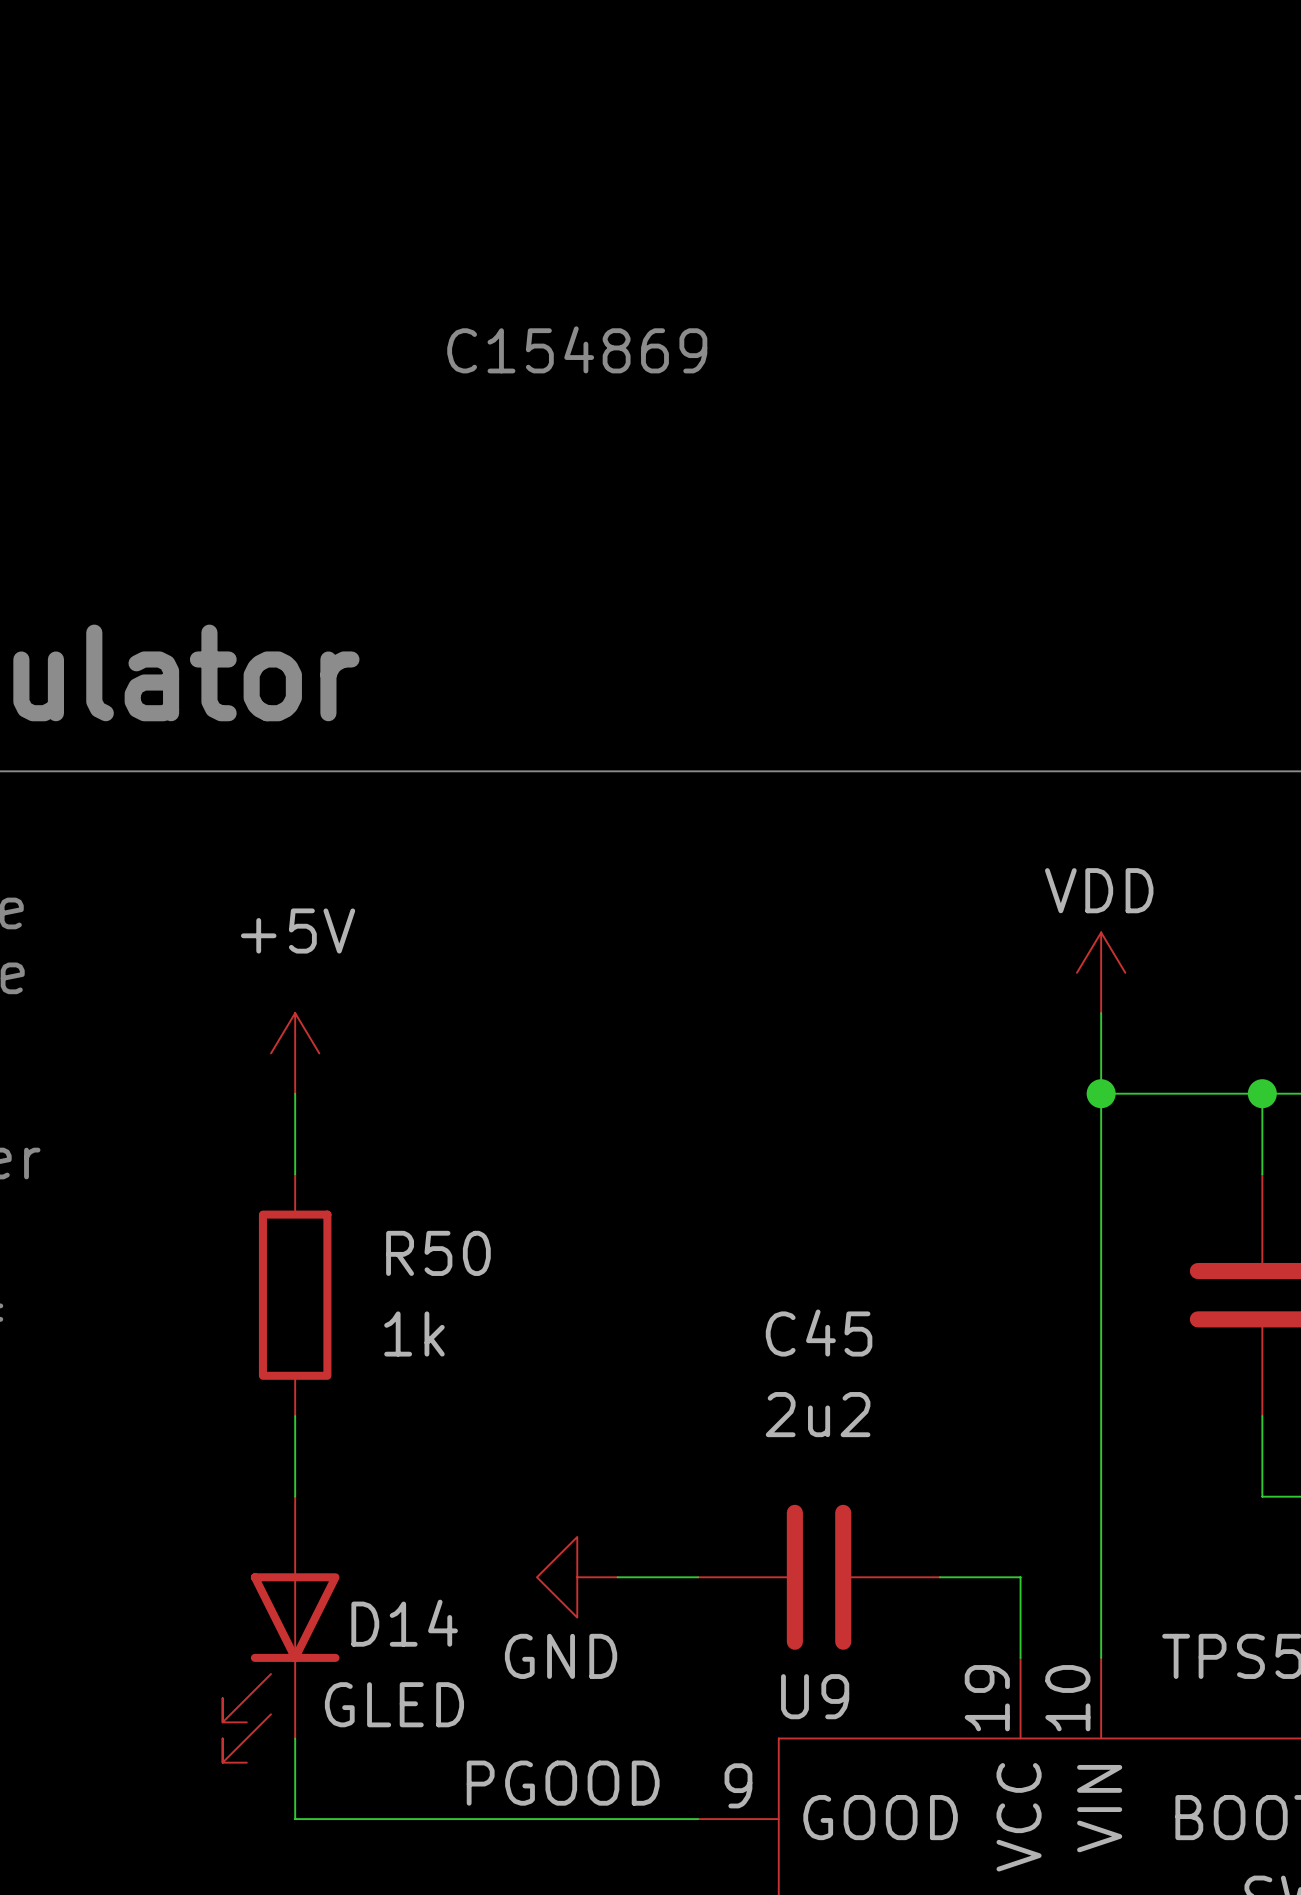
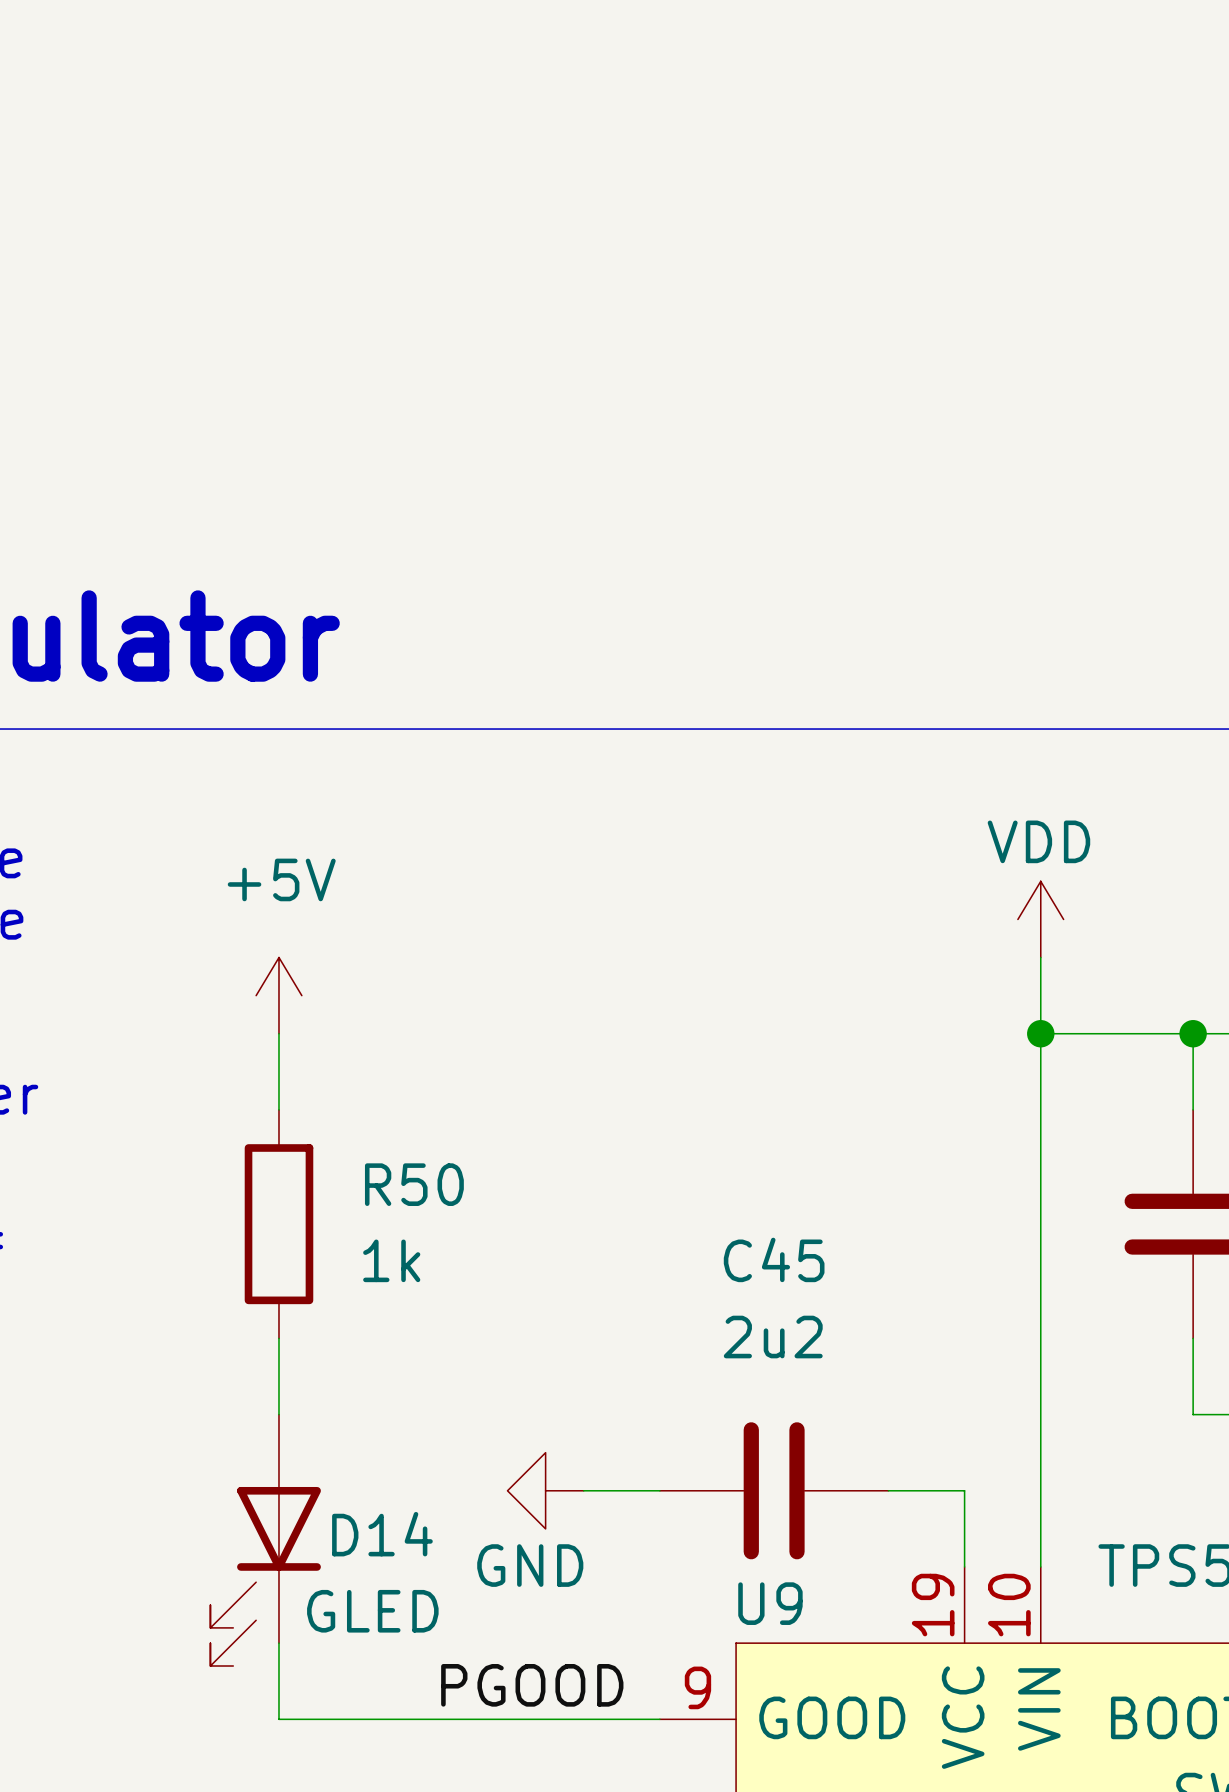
text: C154869 (577, 349) -> none

